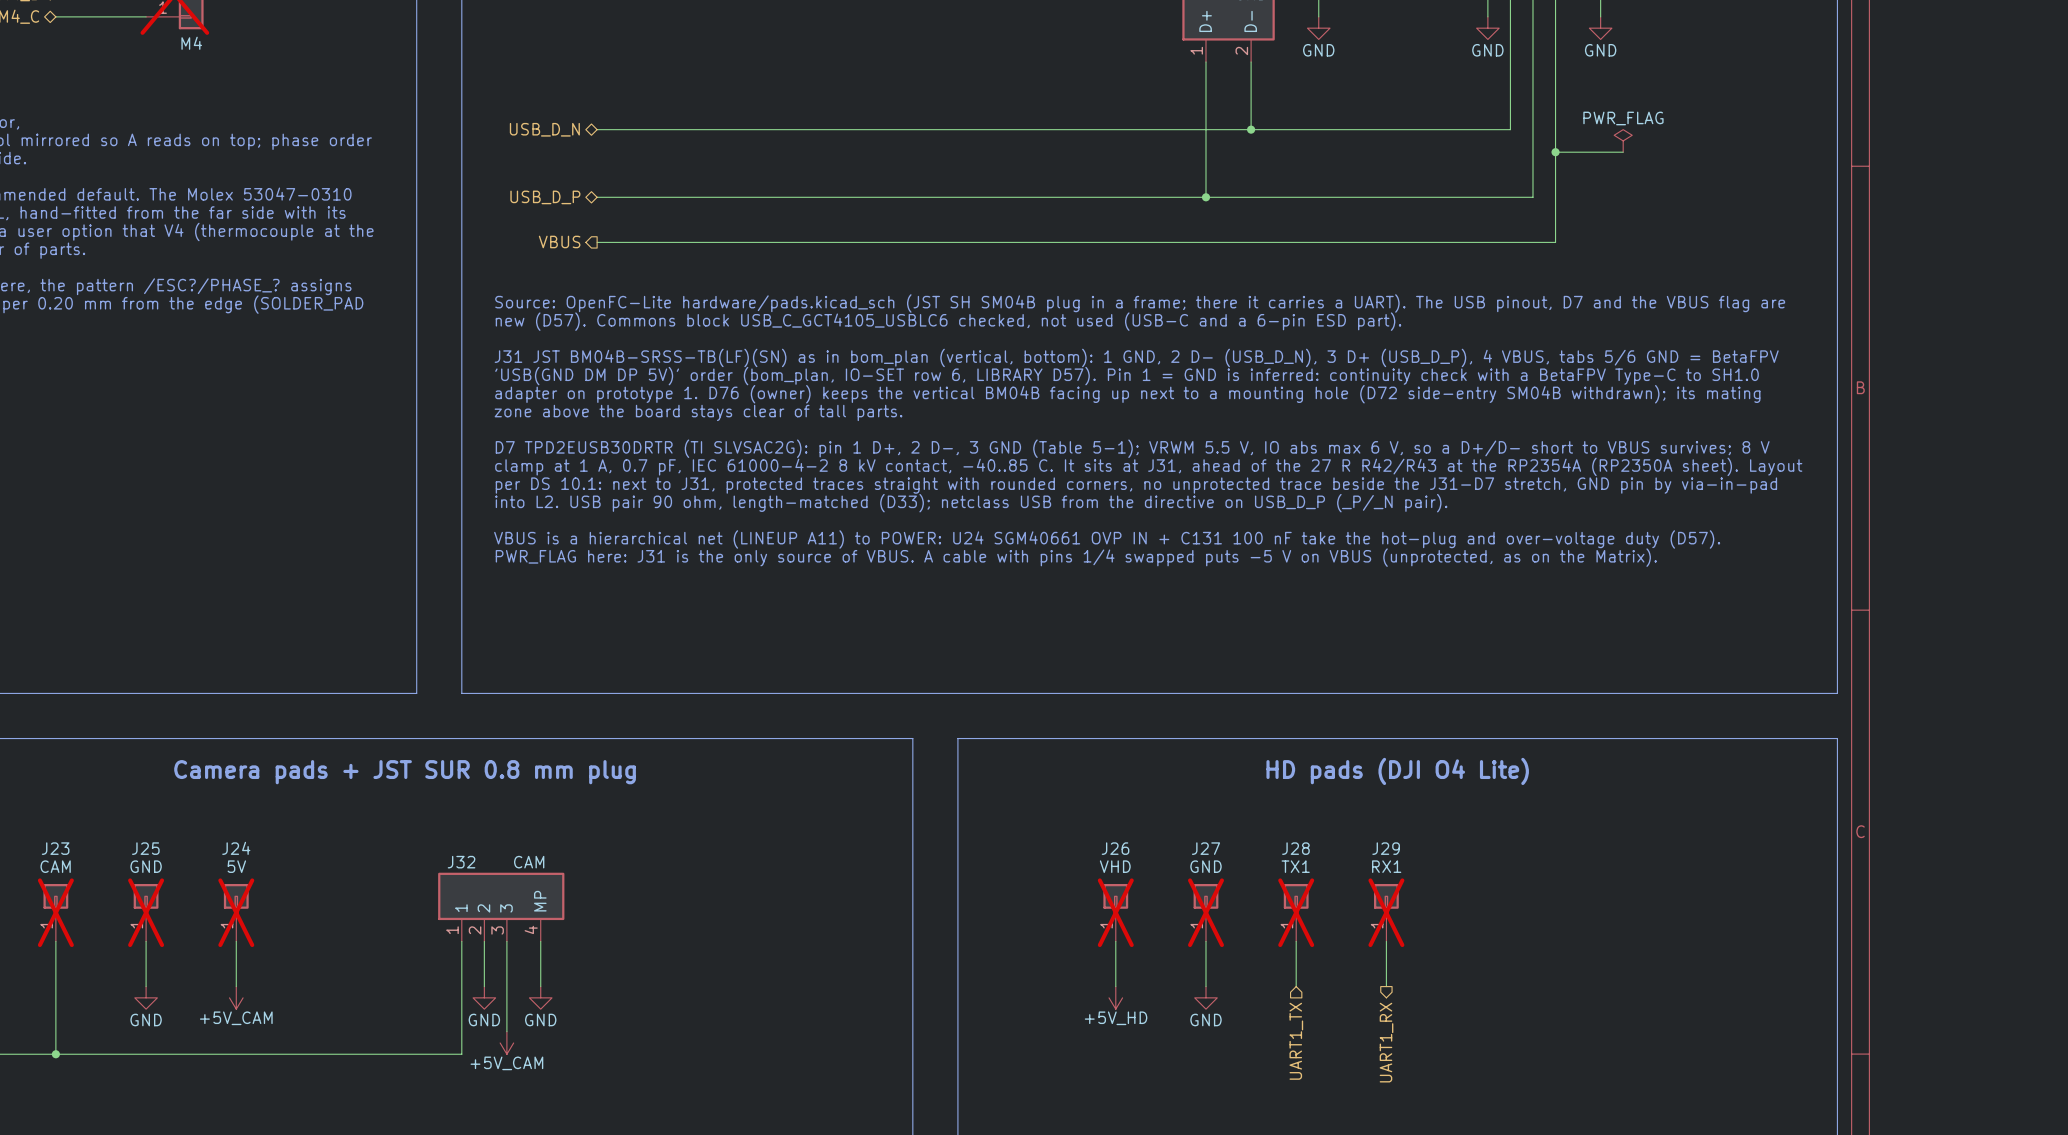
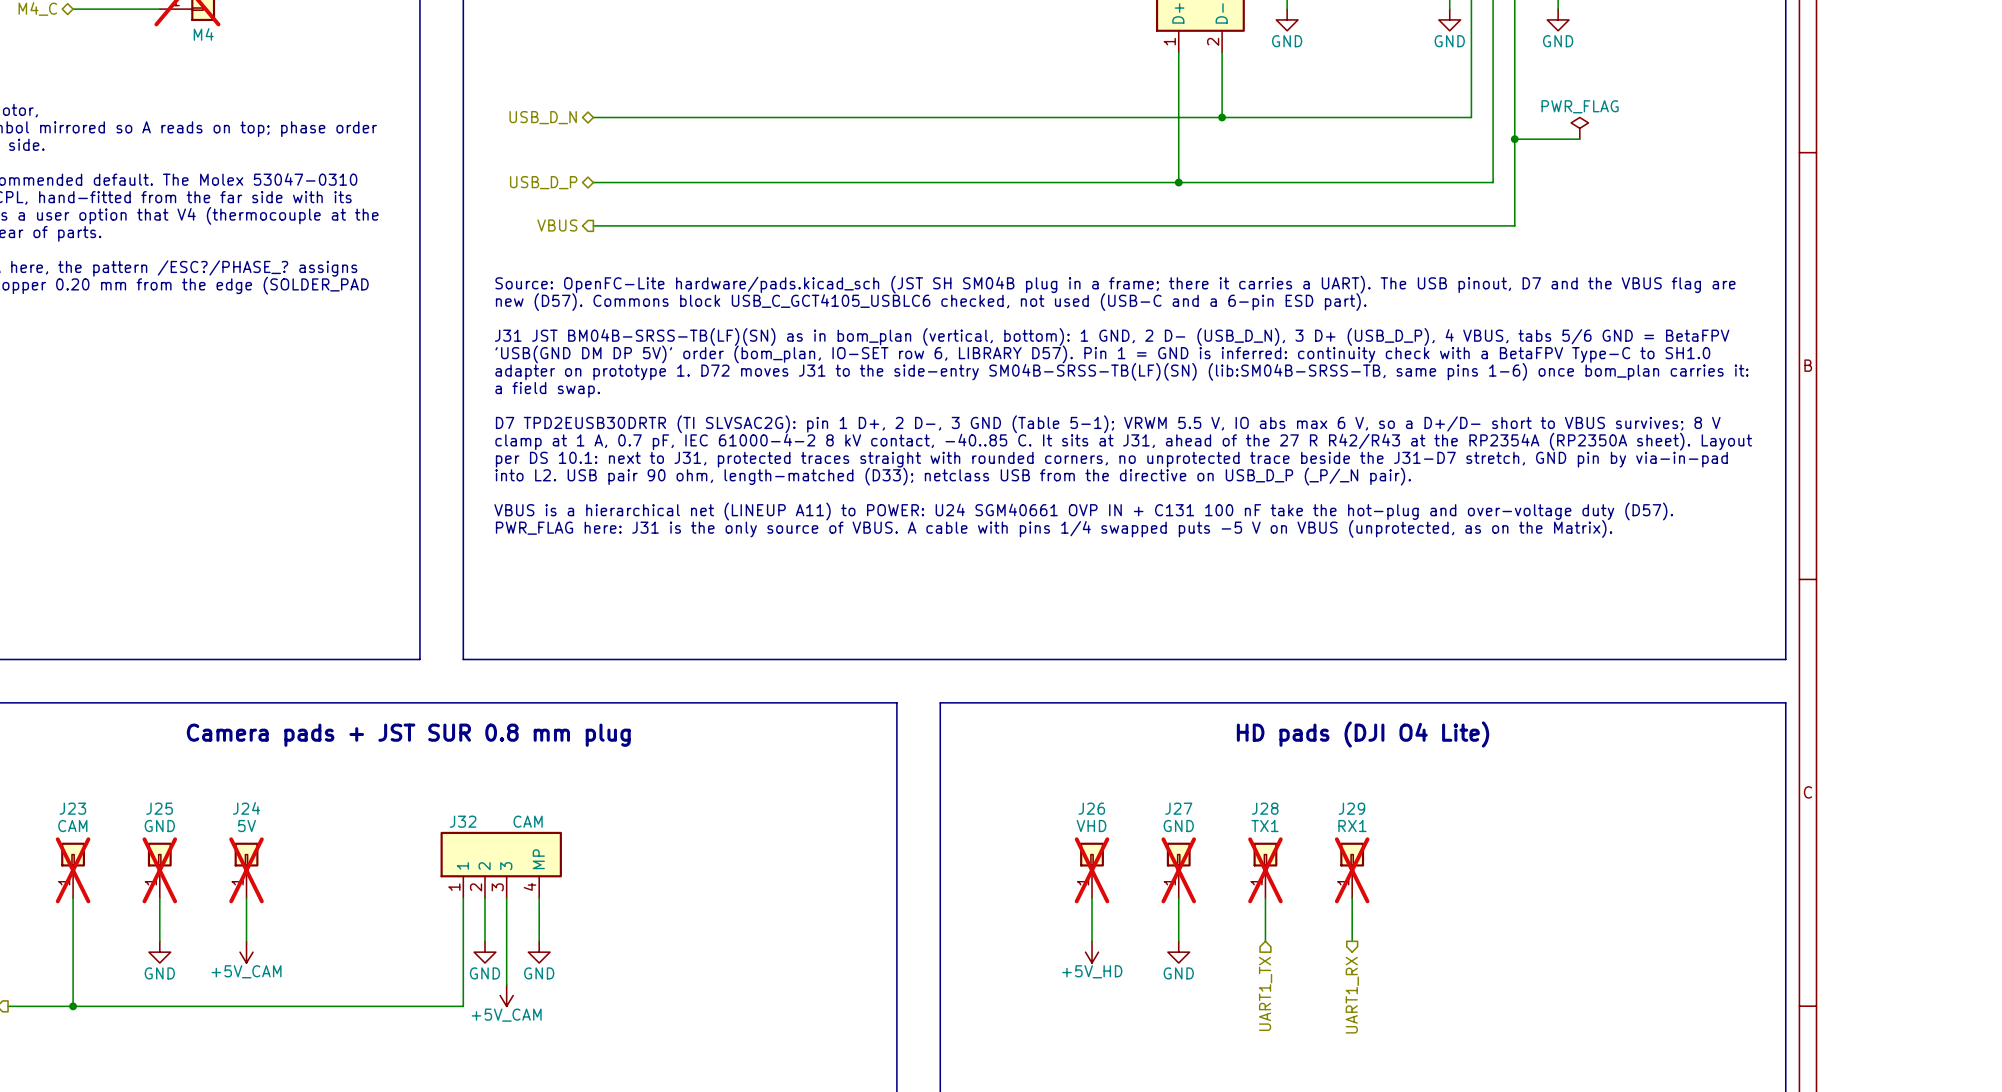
text: adapter on prototype 1. D76 (owner) keeps the vertical BM04B facing up next to a mounting hole (D72 side-entry SM04B withdrawn); its mating (1127, 394) -> adapter on prototype 1. D72 moves J31 to the side-entry SM04B-SRSS-TB(LF)(SN) (lib:SM04B-SRSS-TB, same pins 1-6) once bom_plan carries it: (1121, 371)
text: zone above the board stays clear of tall parts. (698, 412) -> a field swap. (547, 389)

